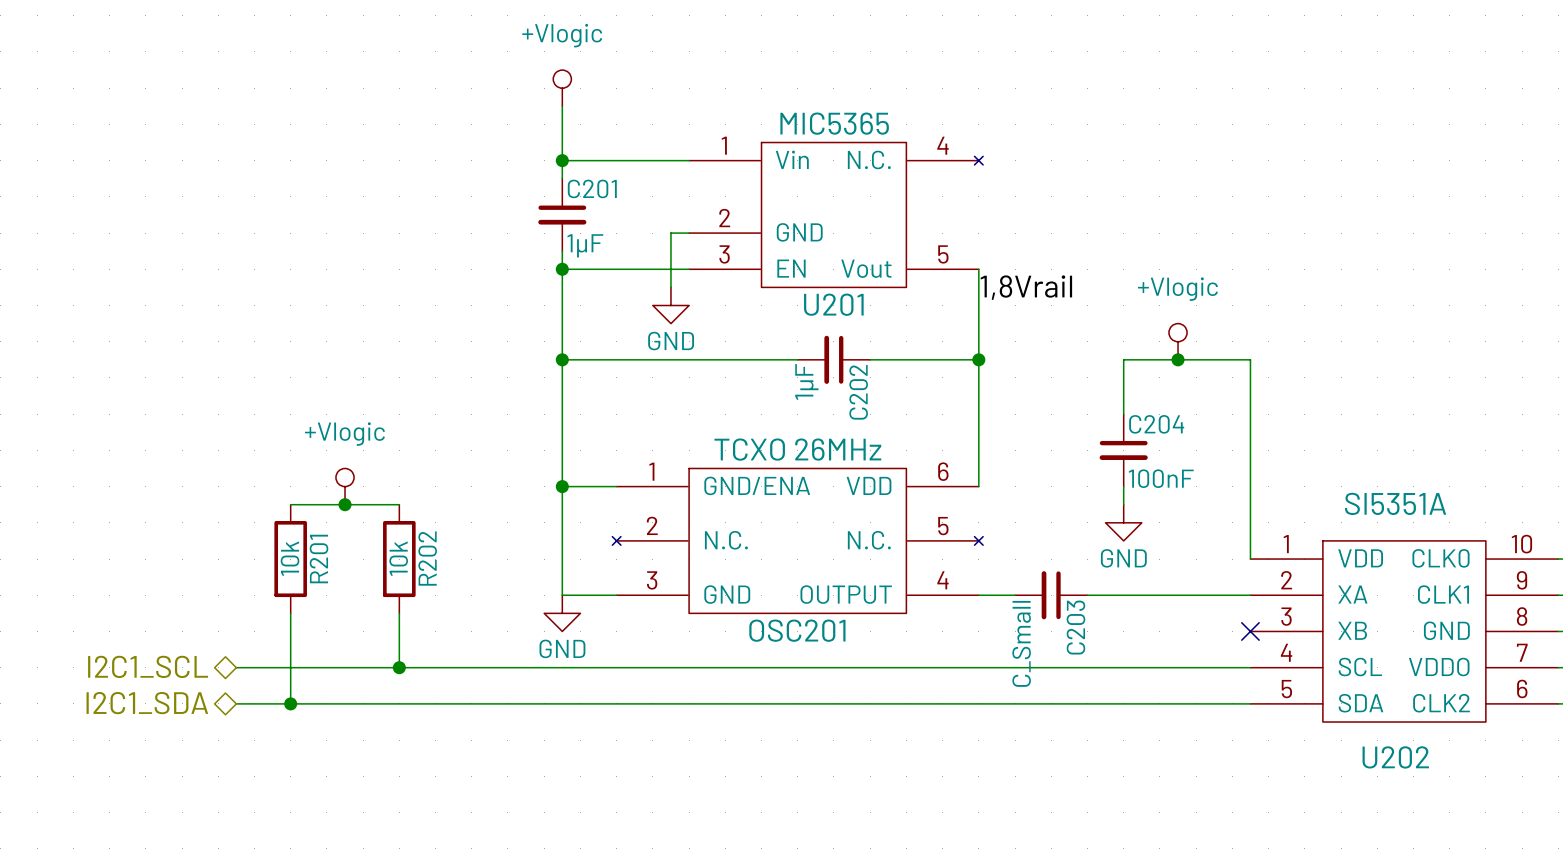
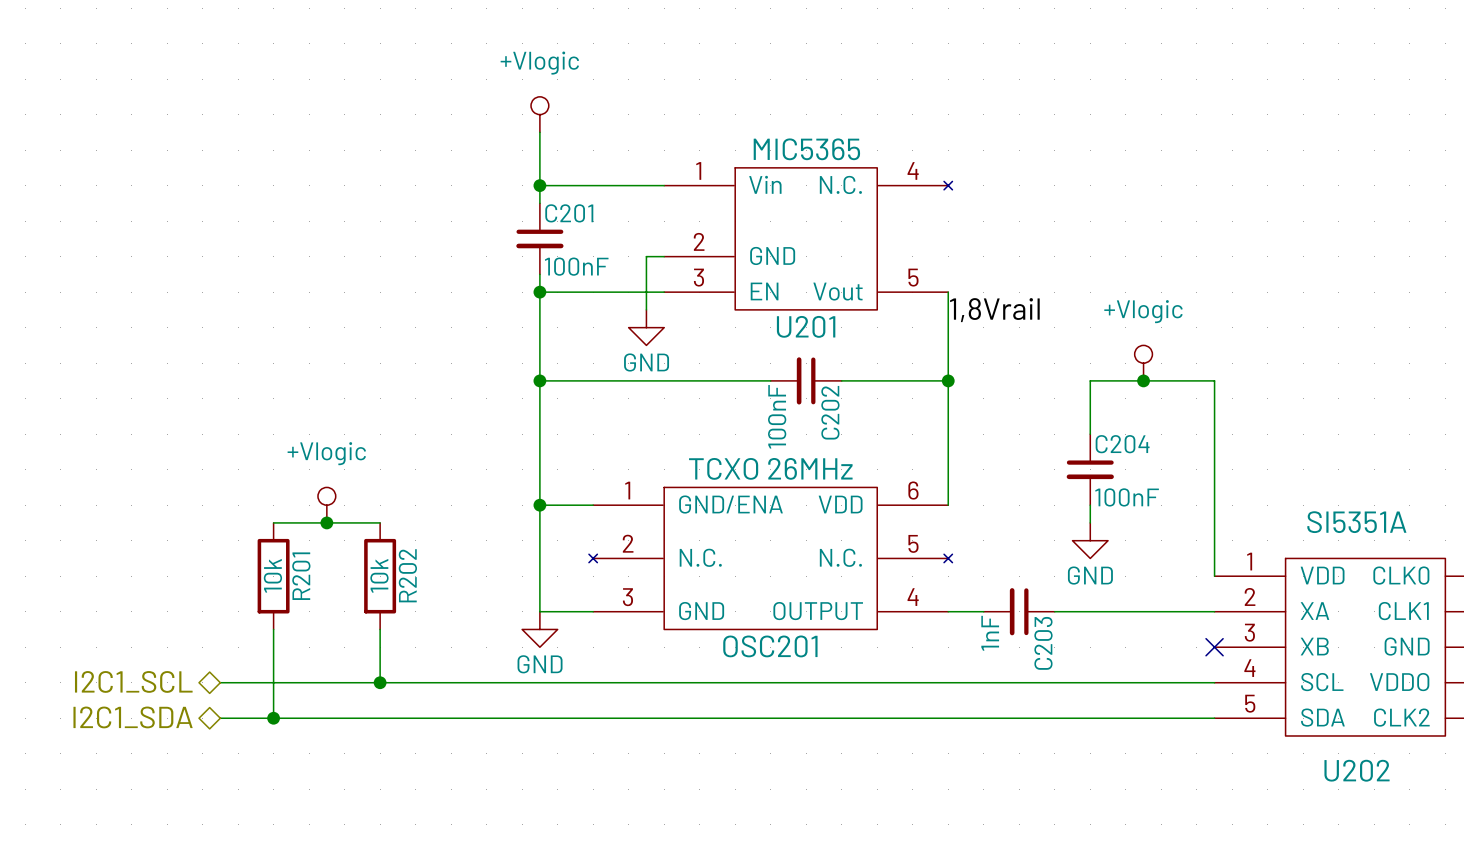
C201 value: 1µF (585, 245) -> 100nF (576, 266)
C202 value: 1µF (806, 381) -> 100nF (777, 416)
C203 value: C_Small (1021, 643) -> 1nF (990, 633)

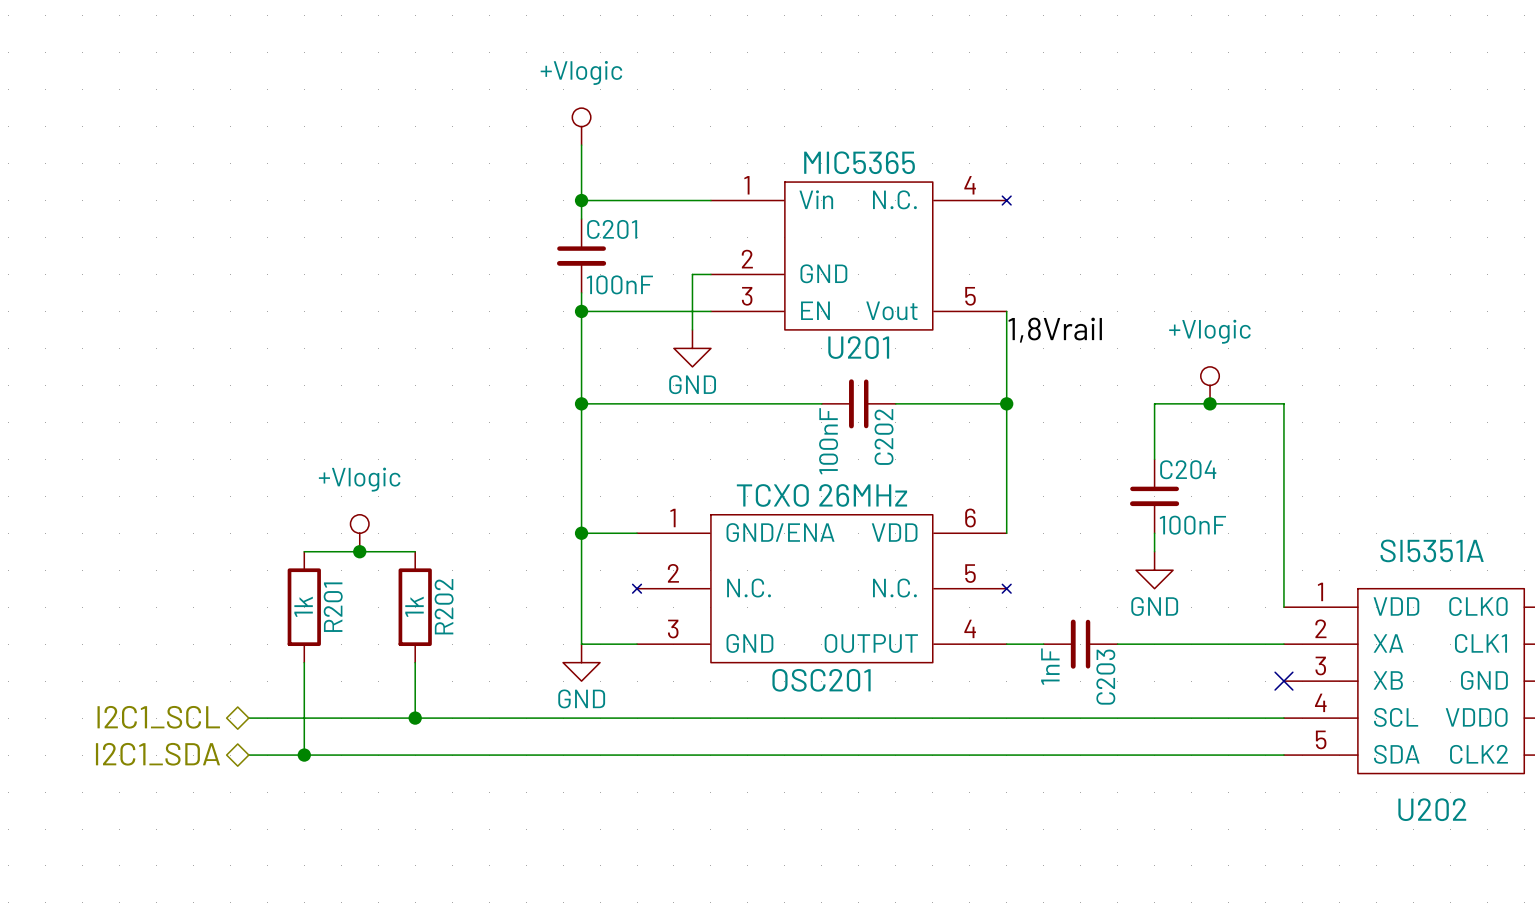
R201 value: 10k (272, 575) -> 1k (303, 606)
R202 value: 10k (379, 575) -> 1k (414, 606)

